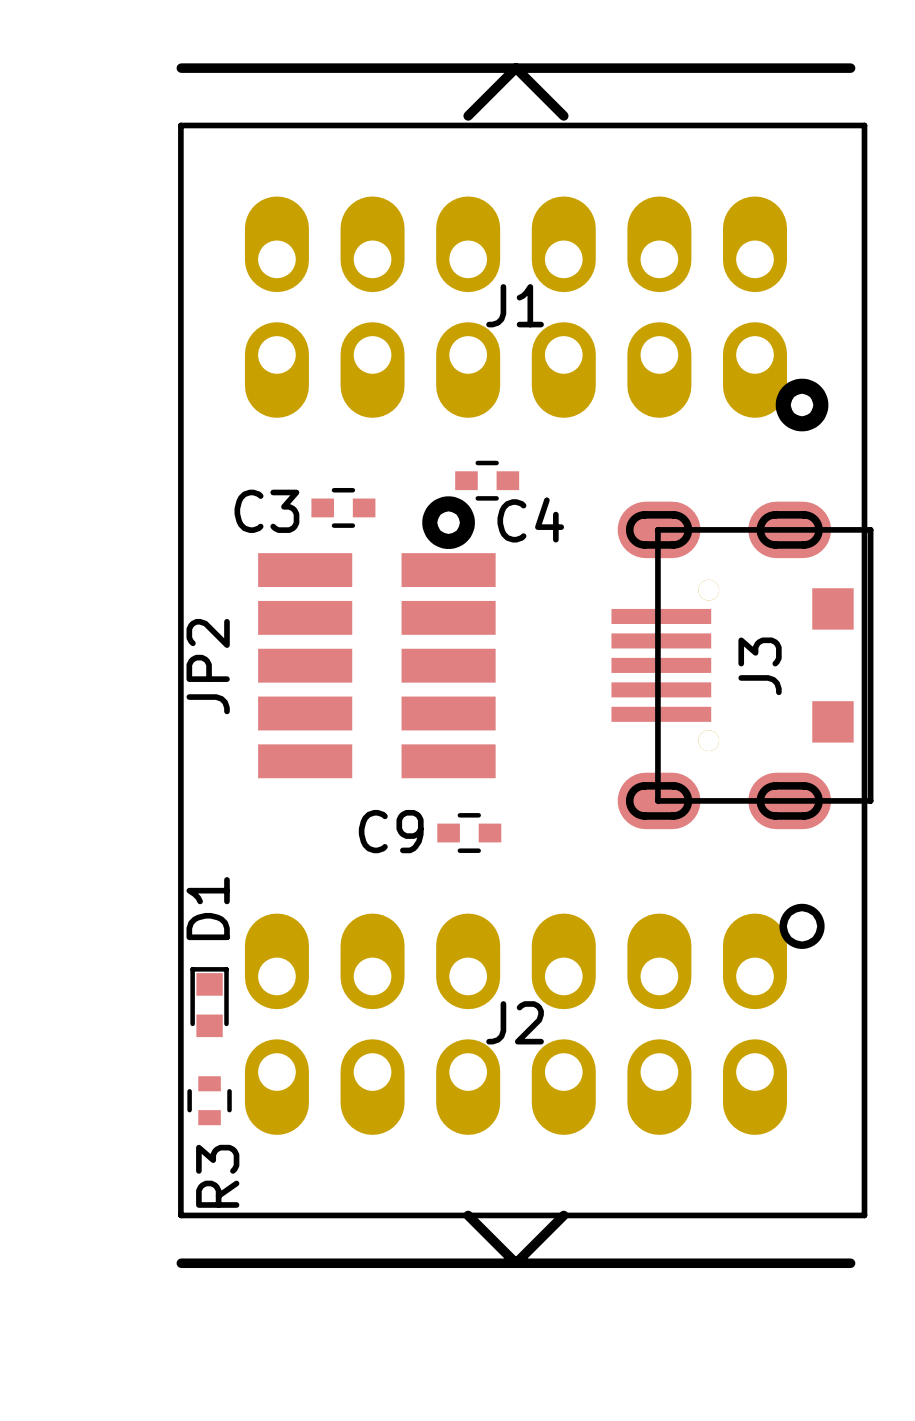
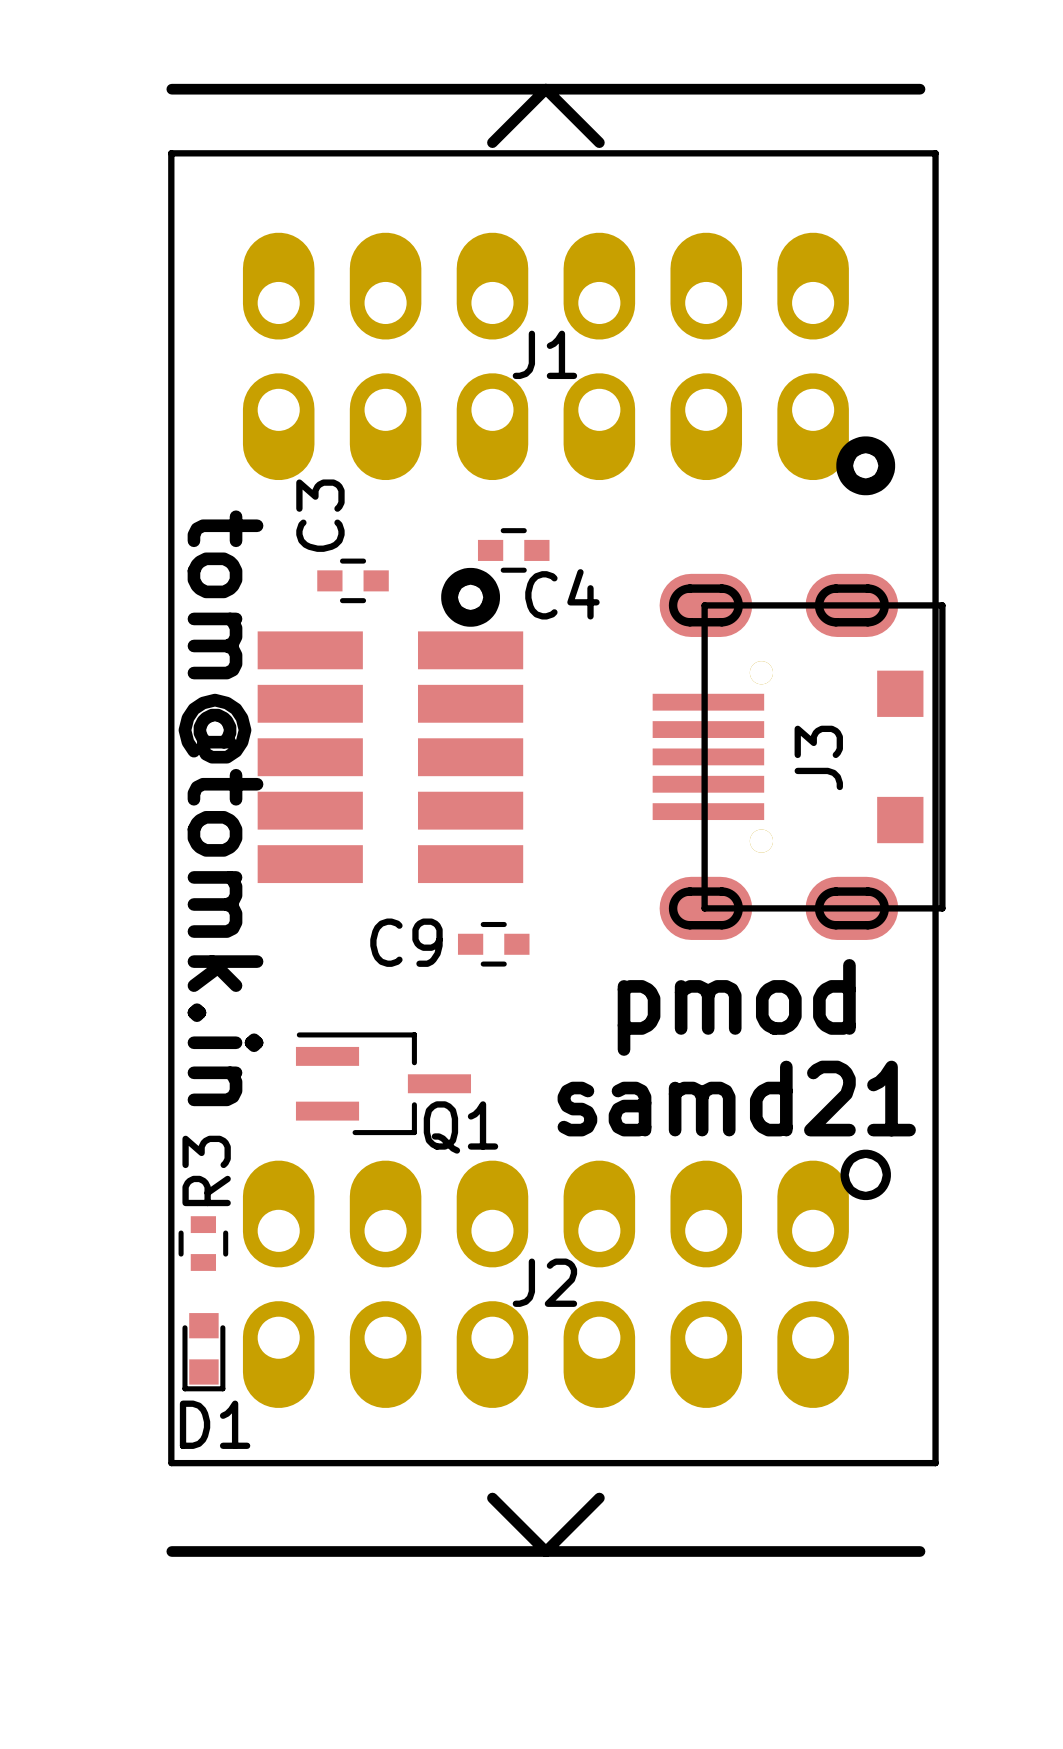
C3 name rotation: 0° (266, 511) -> 90° counterclockwise (320, 515)
JP2 name: JP2 (208, 666) -> none
text: none -> tom@tomk.in (221, 808)
text: none -> pmod (736, 1007)
Q1: none -> (383, 1083)
text: none -> samd21 (736, 1098)
D1 rotation: 0° (209, 1002) -> 180° (203, 1352)
D1 position: (209, 1002) -> (203, 1352)
J2 position: (515, 1085) -> (545, 1353)
R3 name position: R3 (217, 1176) -> R3 (206, 1170)
board edge: none -> (171, 1371) (171, 1463)
board edge: (181, 1215) (864, 1215) -> (171, 1463) (935, 1463) (935, 1371)

